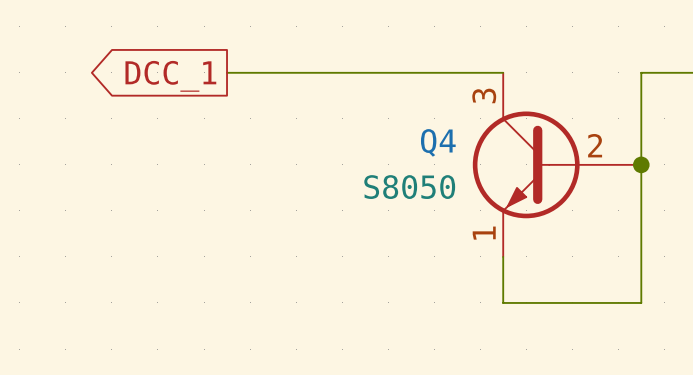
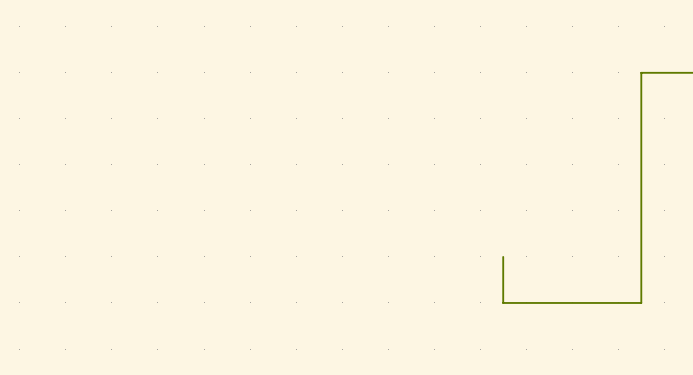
wire: (227, 72) (503, 72) -> none
global label: DCC_1 (170, 76) -> none
Q4: S8050 (557, 164) -> none
junction: (641, 164) -> none

